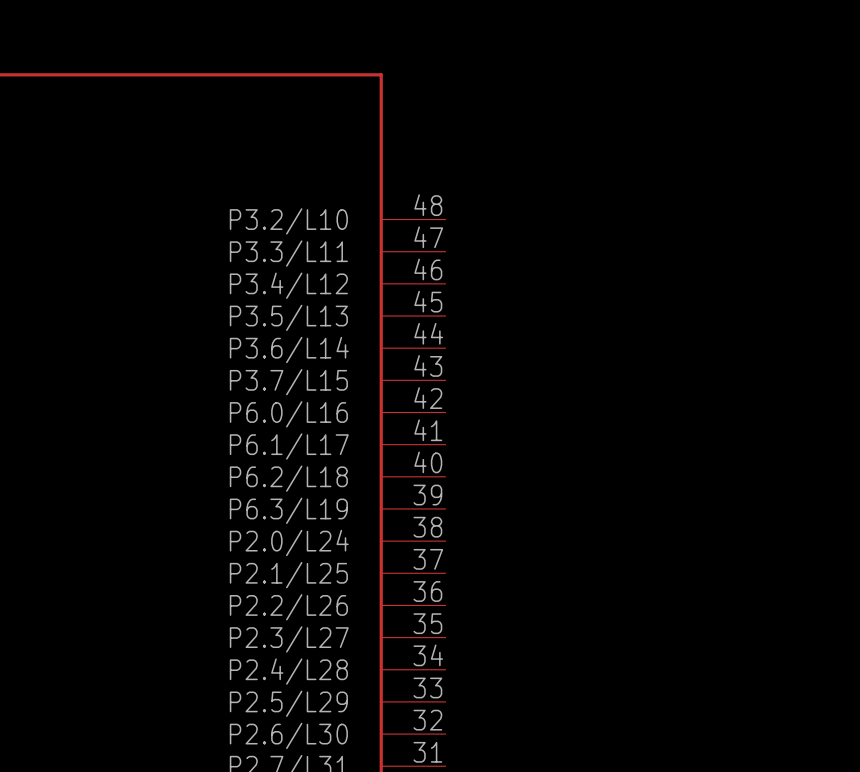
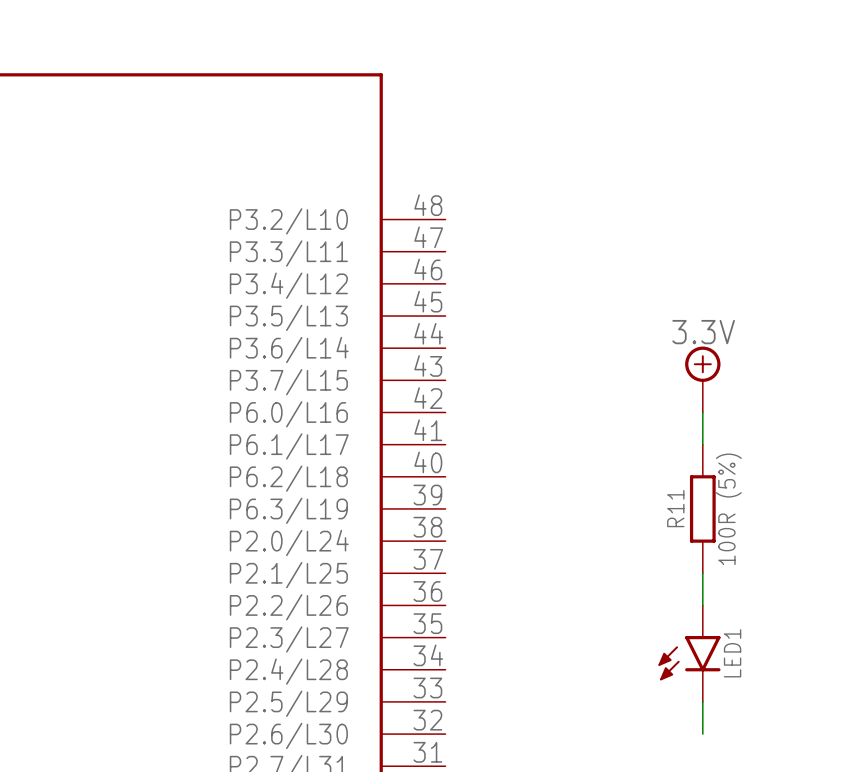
power symbol: none -> 3.3V (702, 379)
wire: none -> (702, 412) (702, 444)
R11: none -> 100R (5%) (702, 508)
wire: none -> (702, 573) (702, 605)
LED1: none -> (689, 653)
wire: none -> (702, 701) (702, 734)

